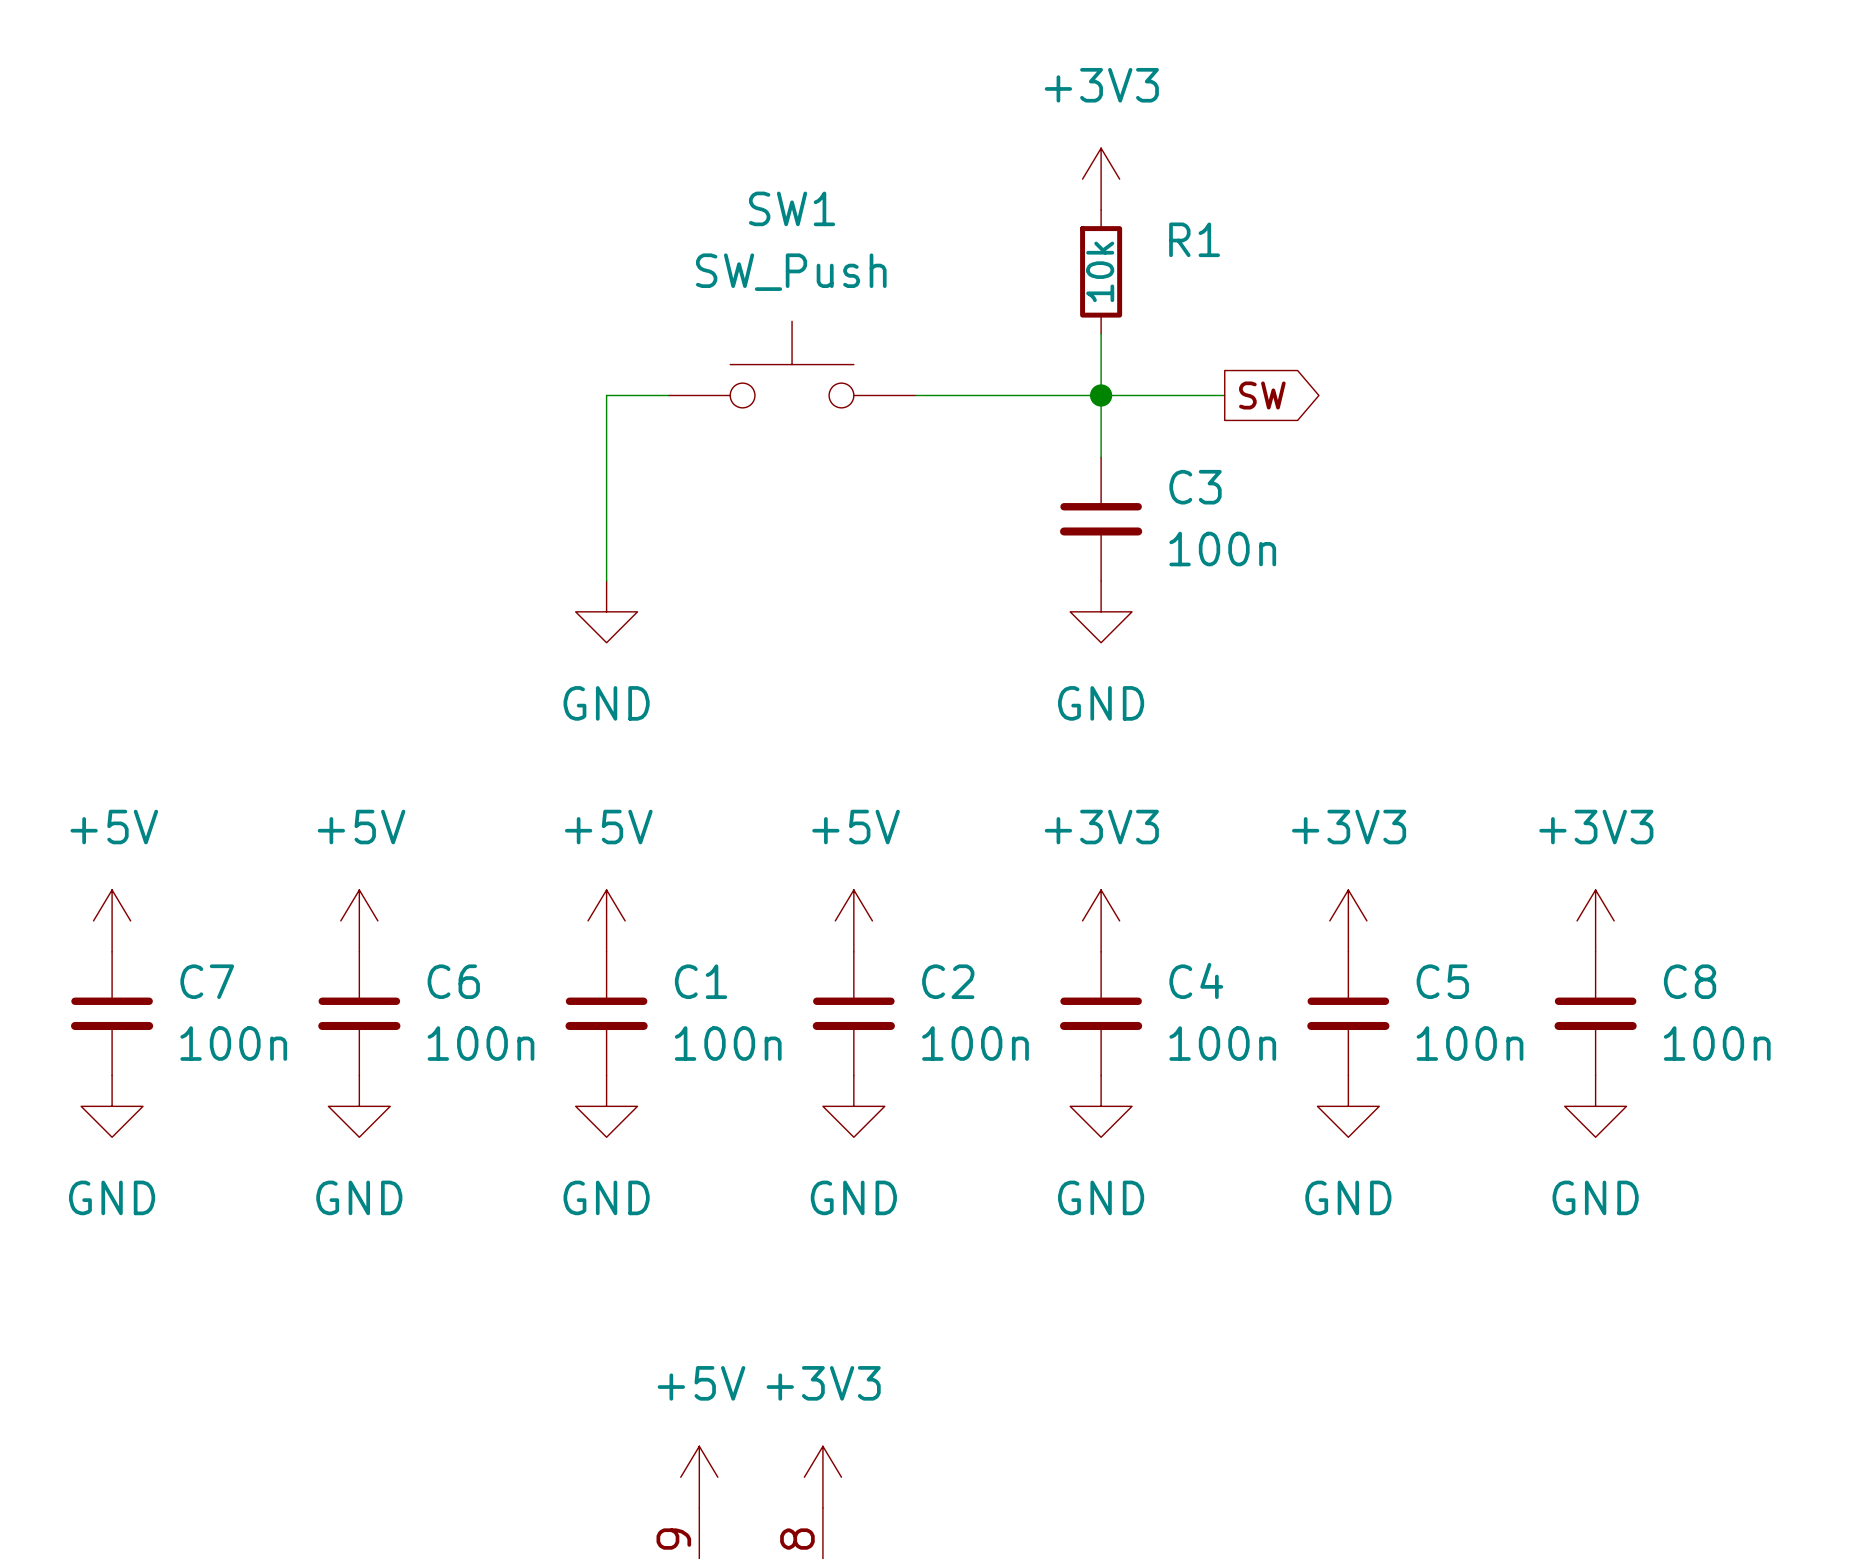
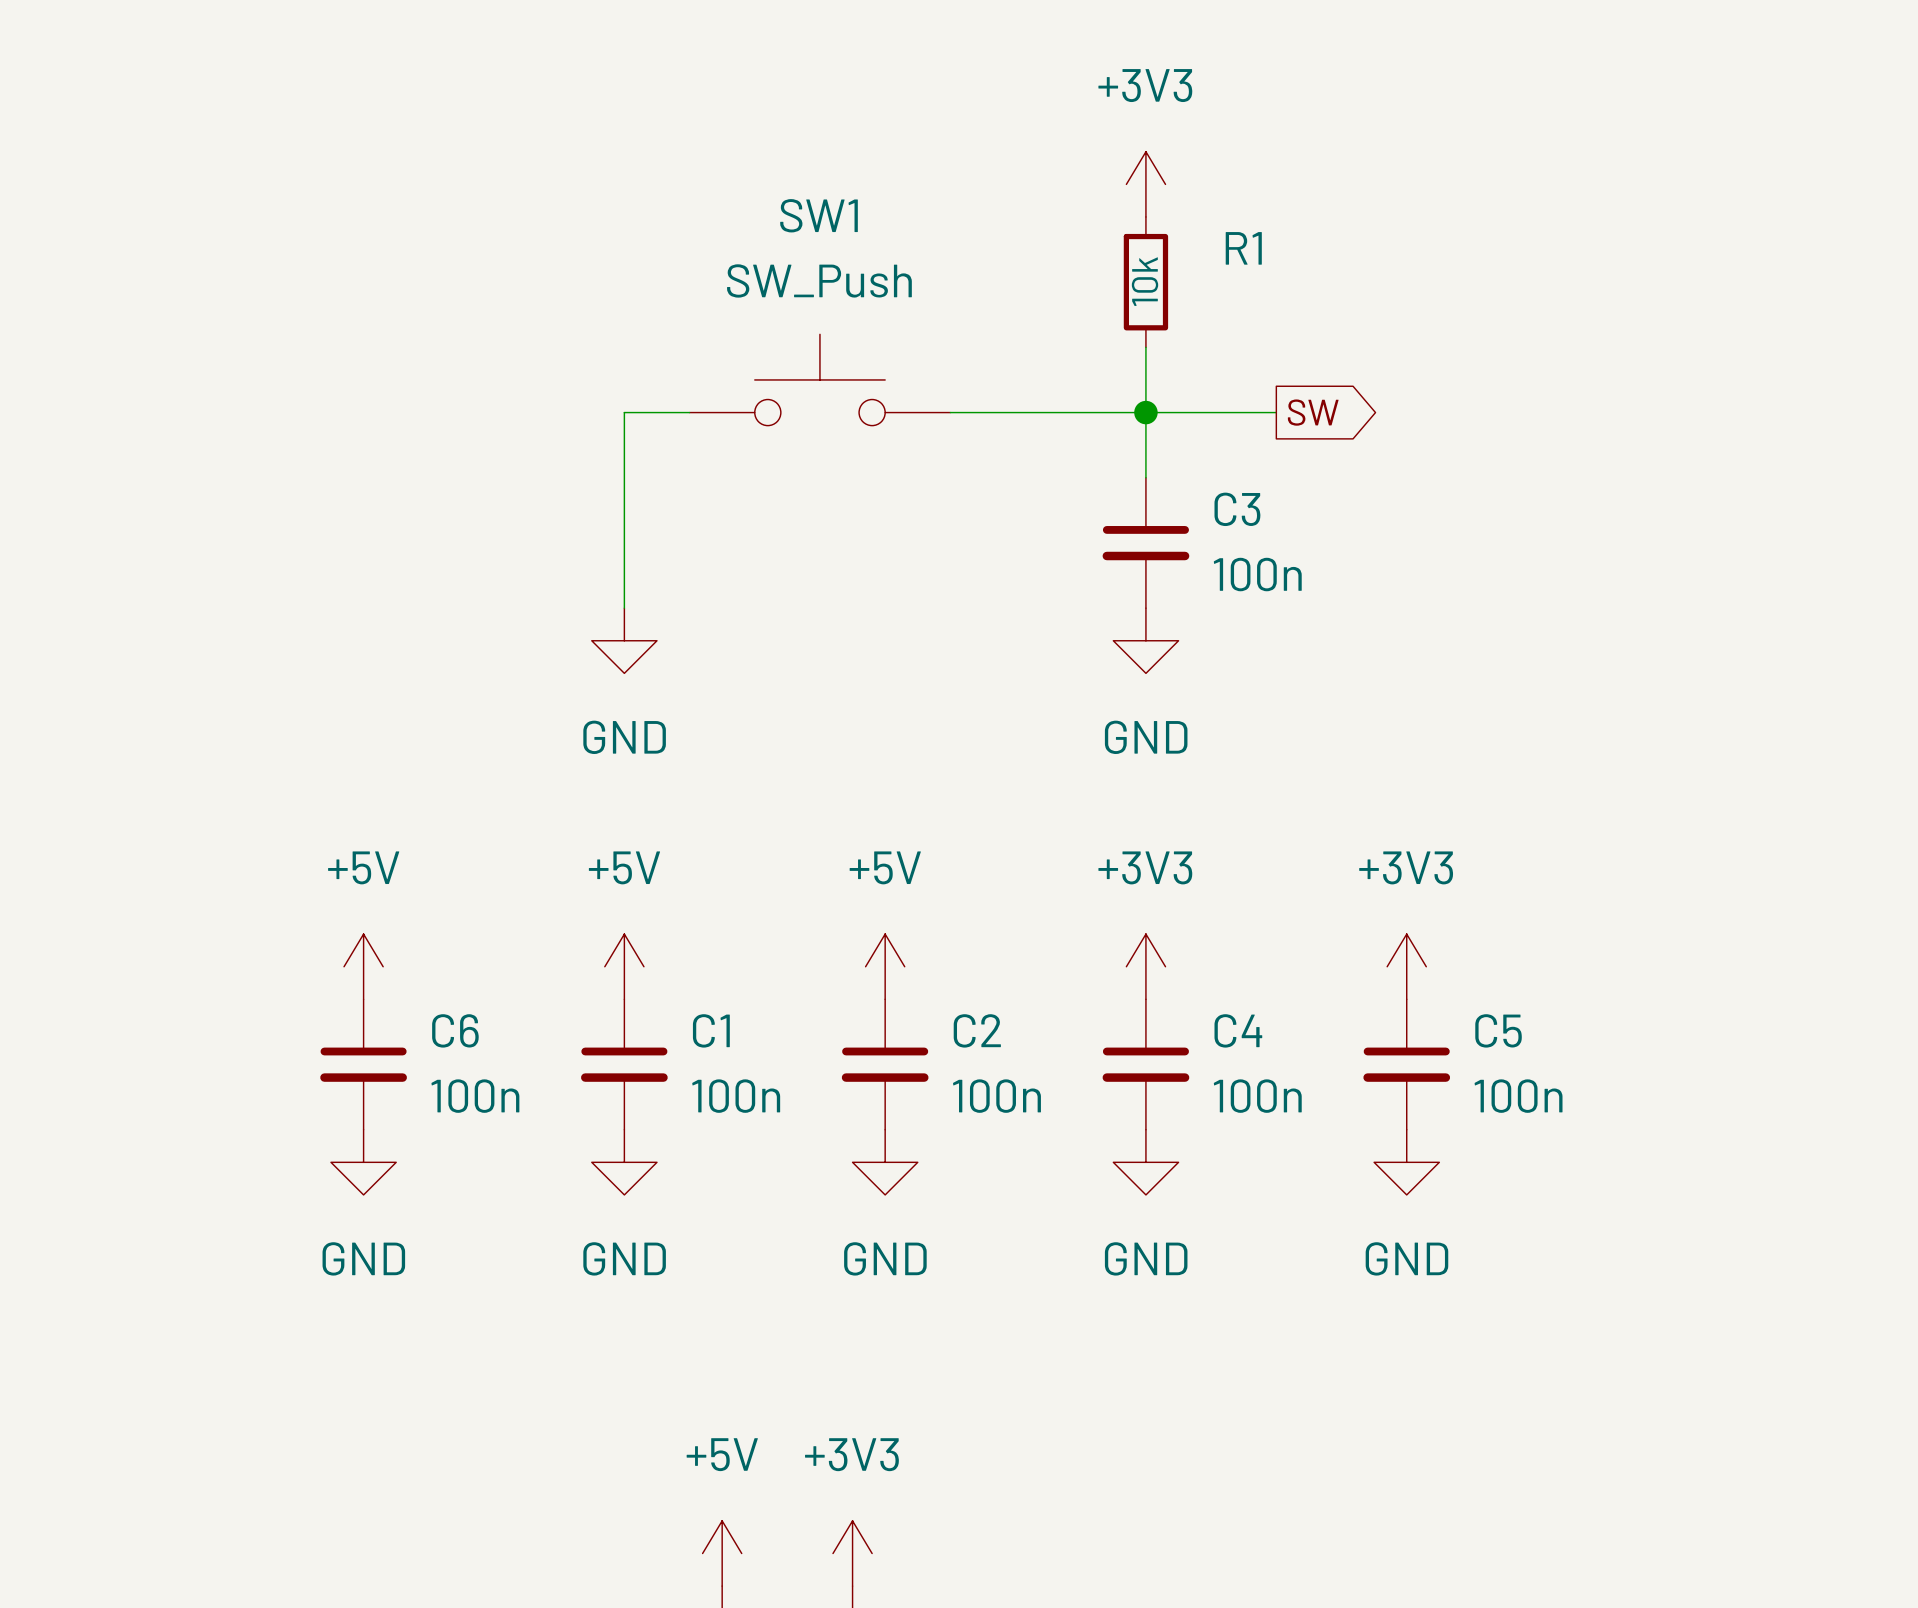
power symbol: +5V (112, 920) -> none
power symbol: +3V3 (1595, 920) -> none
C7: 100n (112, 1013) -> none
C8: 100n (1595, 1013) -> none
power symbol: GND (112, 1106) -> none
power symbol: GND (1595, 1106) -> none

